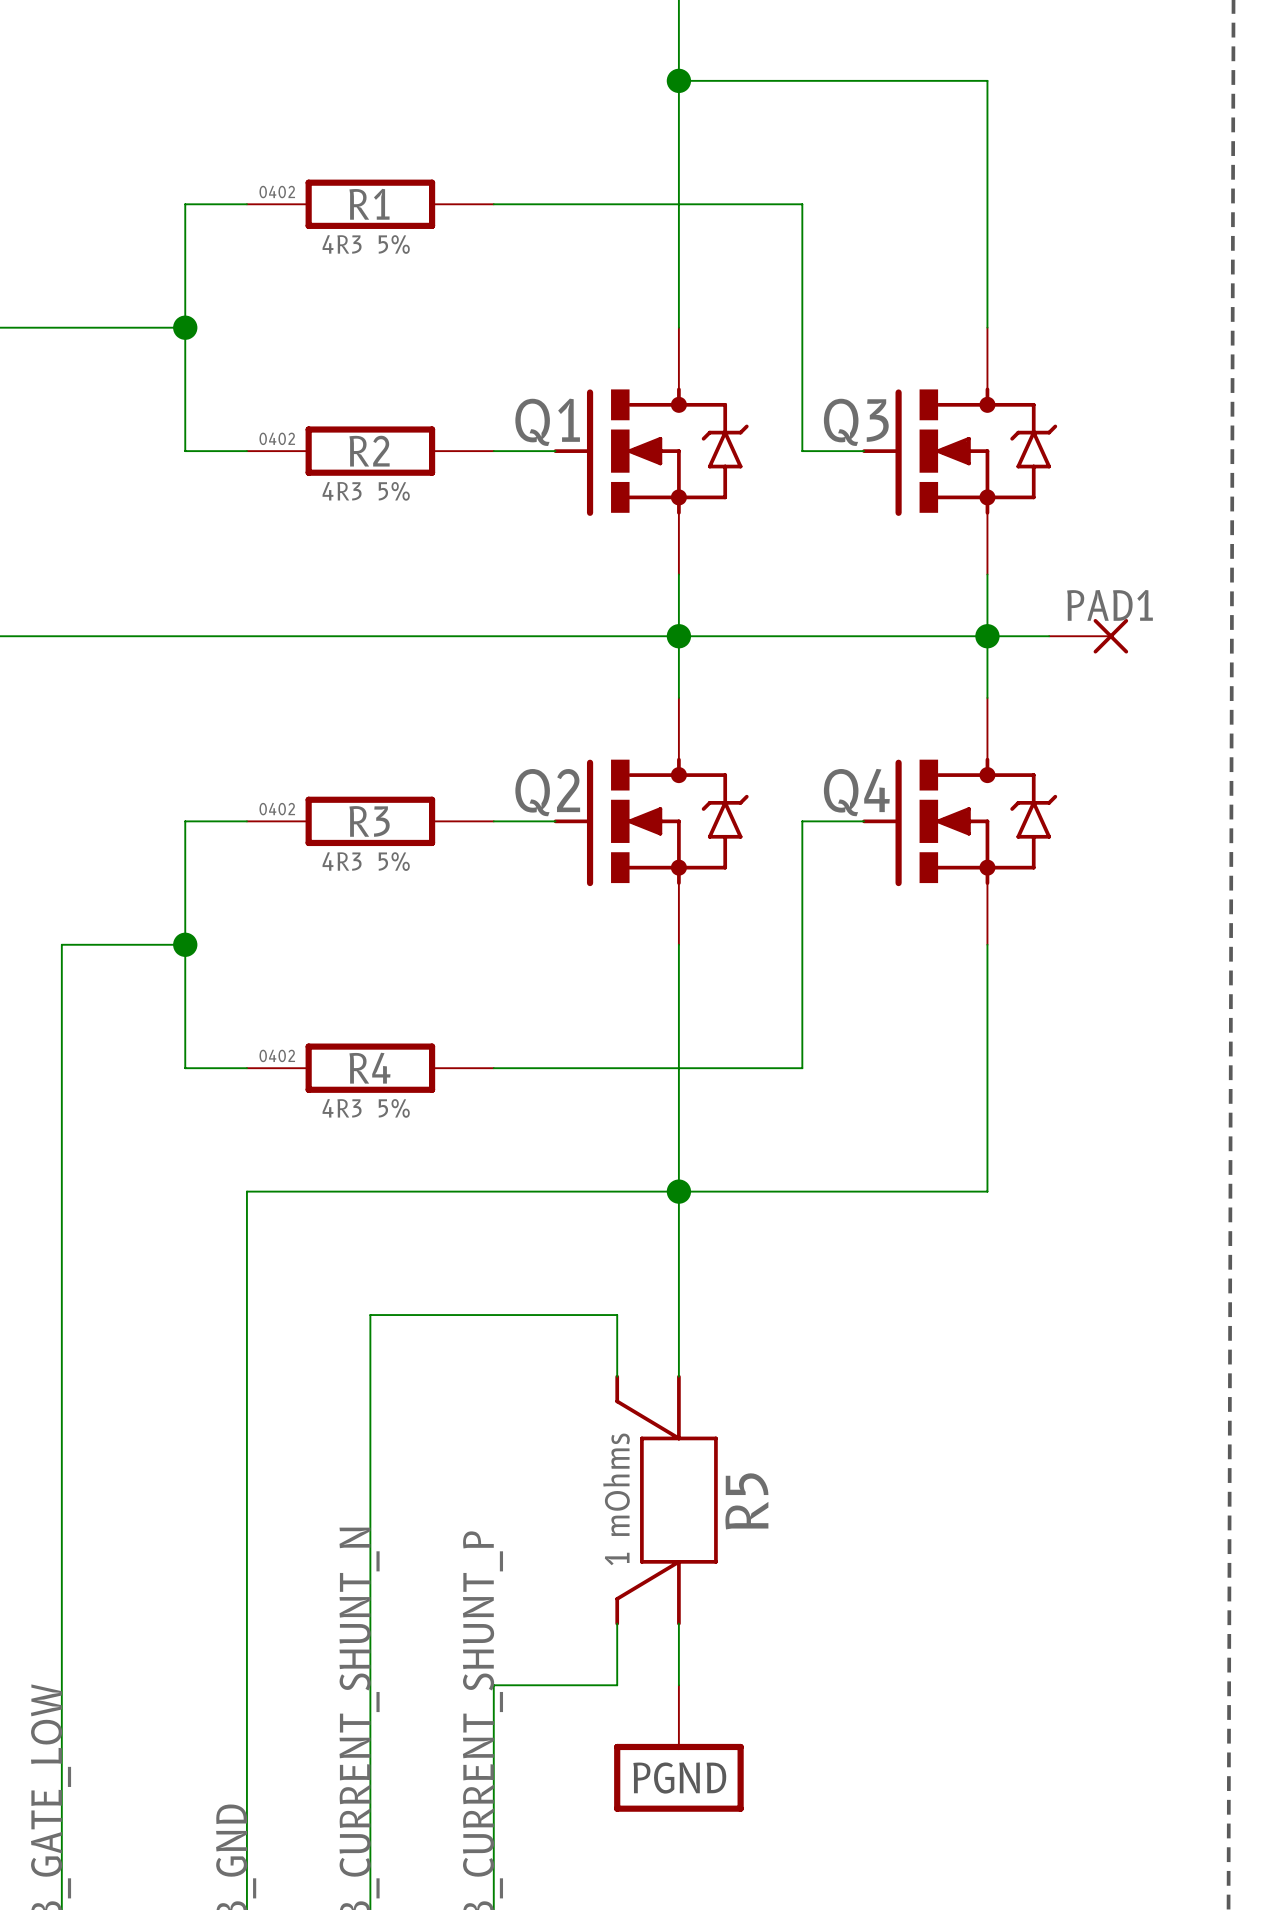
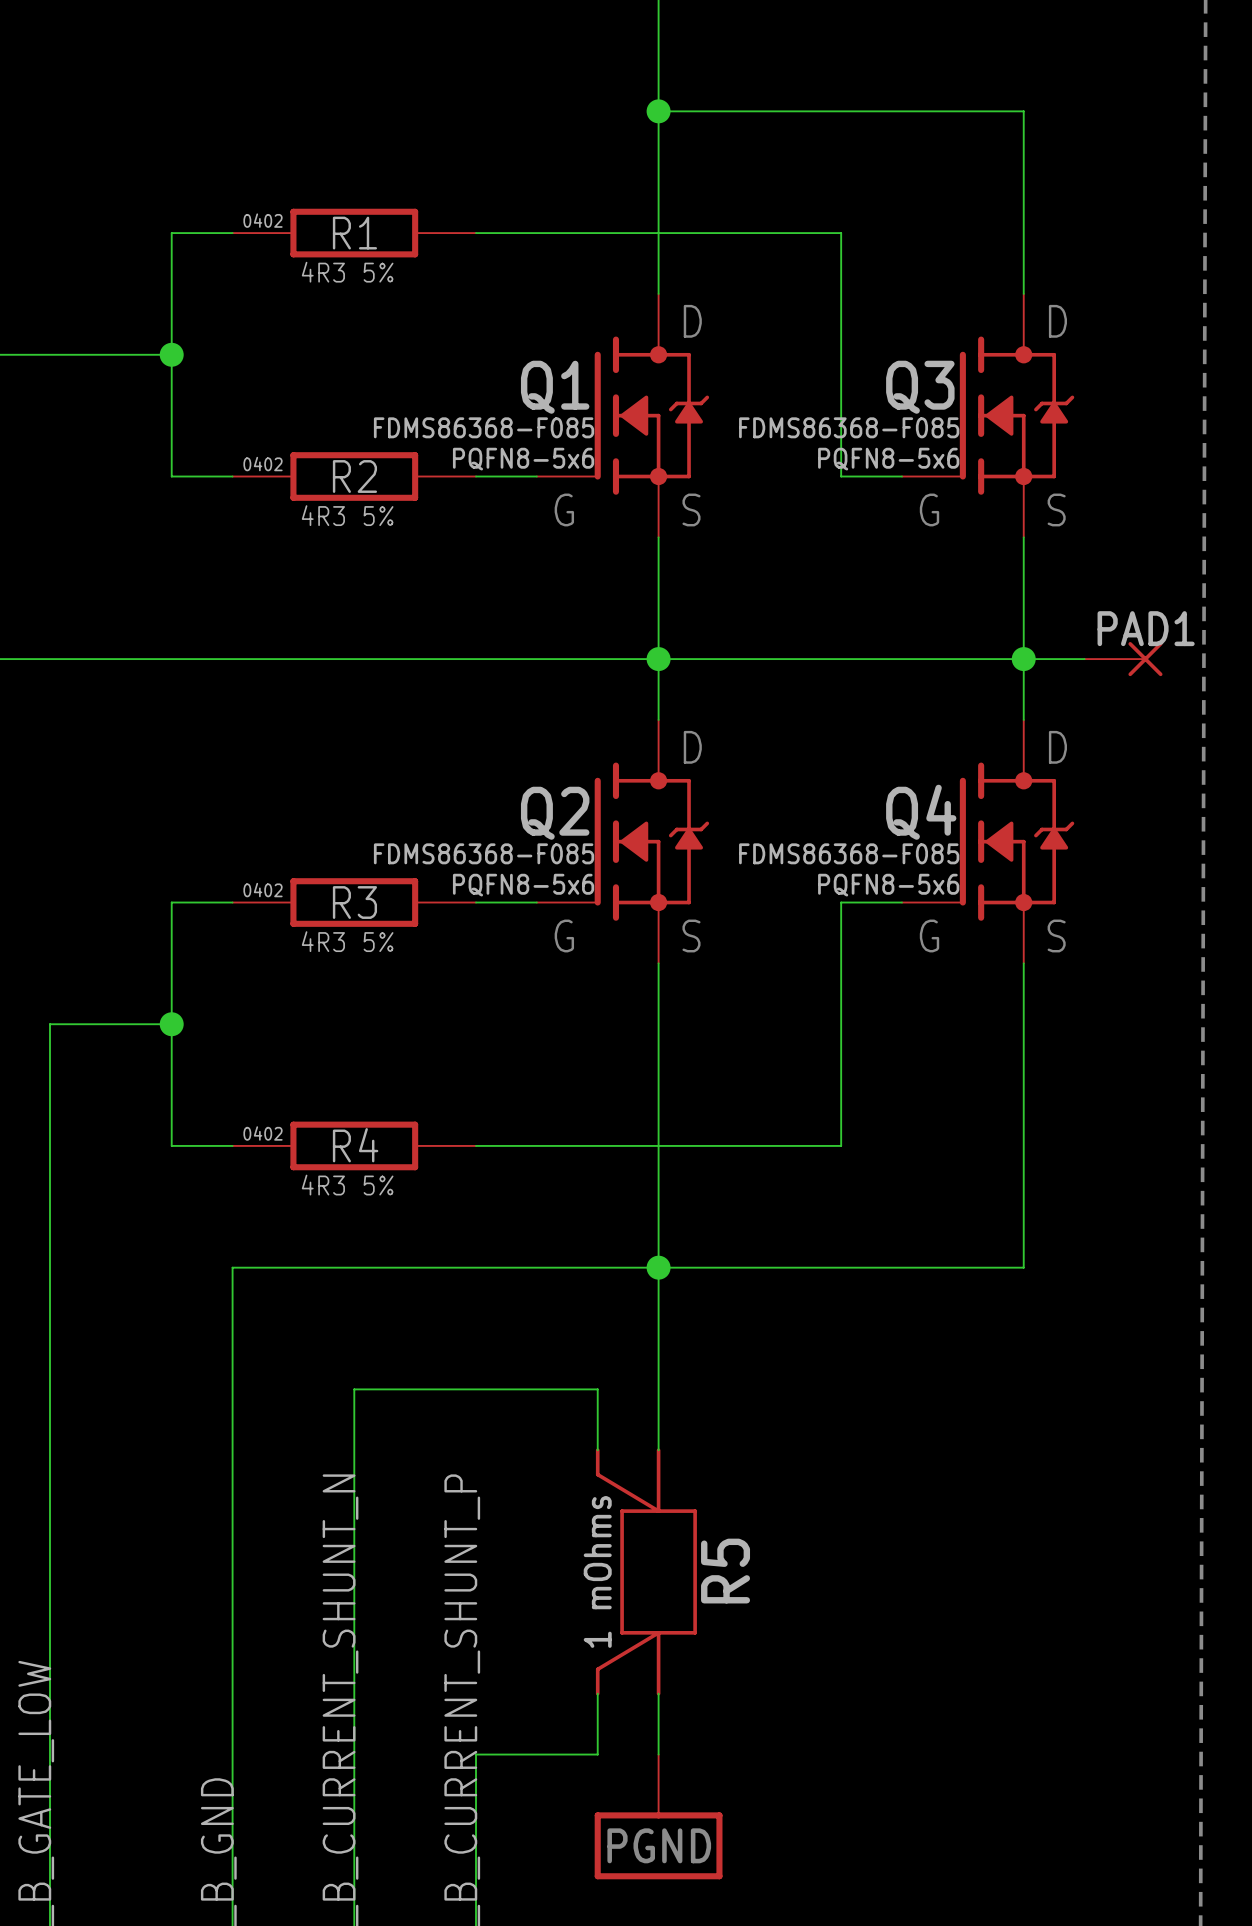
wire: (987, 80) (987, 327) -> (962, 111) (1023, 111) (1023, 293)
wire: (802, 204) (802, 451) (864, 451) -> (780, 233) (841, 233) (841, 476) (902, 476)
Q1 symbol: [553, 327, 749, 575] -> [536, 293, 710, 538]
Q3 symbol: [862, 327, 1058, 575] -> [902, 293, 1075, 538]
Q1 text: none -> FDMS86368-F085 (484, 427)
Q3 text: none -> FDMS86368-F085 (849, 427)
Q1 text: none -> PQFN8-5x6 (523, 459)
Q3 text: none -> PQFN8-5x6 (888, 459)
wire: none -> (1023, 537) (1023, 719)
wire: (987, 574) (987, 697) -> none
junction position: (987, 636) -> (1023, 659)
PAD1 position: (1088, 636) -> (1123, 659)
Q2 symbol: [553, 697, 749, 945] -> [536, 719, 710, 964]
Q4 symbol: [862, 697, 1058, 945] -> [902, 719, 1075, 964]
wire: (246, 821) (185, 821) (185, 883) -> (232, 902) (171, 902)
R3 position: (370, 821) -> (354, 902)
wire: (493, 821) (555, 821) -> (476, 902) (536, 902)
wire: (864, 821) (802, 821) (802, 1068) (493, 1068) -> none
Q2 text: none -> FDMS86368-F085 (484, 853)
Q4 text: none -> FDMS86368-F085 (849, 853)
Q2 text: none -> PQFN8-5x6 (523, 885)
Q4 text: none -> PQFN8-5x6 (888, 885)
wire: none -> (902, 902) (841, 902) (841, 1145) (476, 1145)
wire: (185, 944) (61, 944) (61, 1006) -> (171, 1024) (50, 1024)
junction position: (185, 944) -> (171, 1024)
wire: (987, 944) (987, 1191) (246, 1191) (246, 1253) -> (1023, 963) (1023, 1267) (232, 1267)
wire: (185, 1068) (246, 1068) -> (171, 1085) (171, 1145) (232, 1145)
R4 position: (370, 1068) -> (354, 1145)
junction position: (678, 1191) -> (658, 1267)
wire: (370, 1376) (370, 1315) (617, 1315) (617, 1376) -> (354, 1389) (597, 1389) (597, 1450)
R5 position: (666, 1500) -> (646, 1571)
wire: (617, 1623) (617, 1685) (493, 1685) (493, 1746) -> (597, 1693) (597, 1754) (476, 1754)
power symbol position: PGND (678, 1748) -> PGND (658, 1816)

